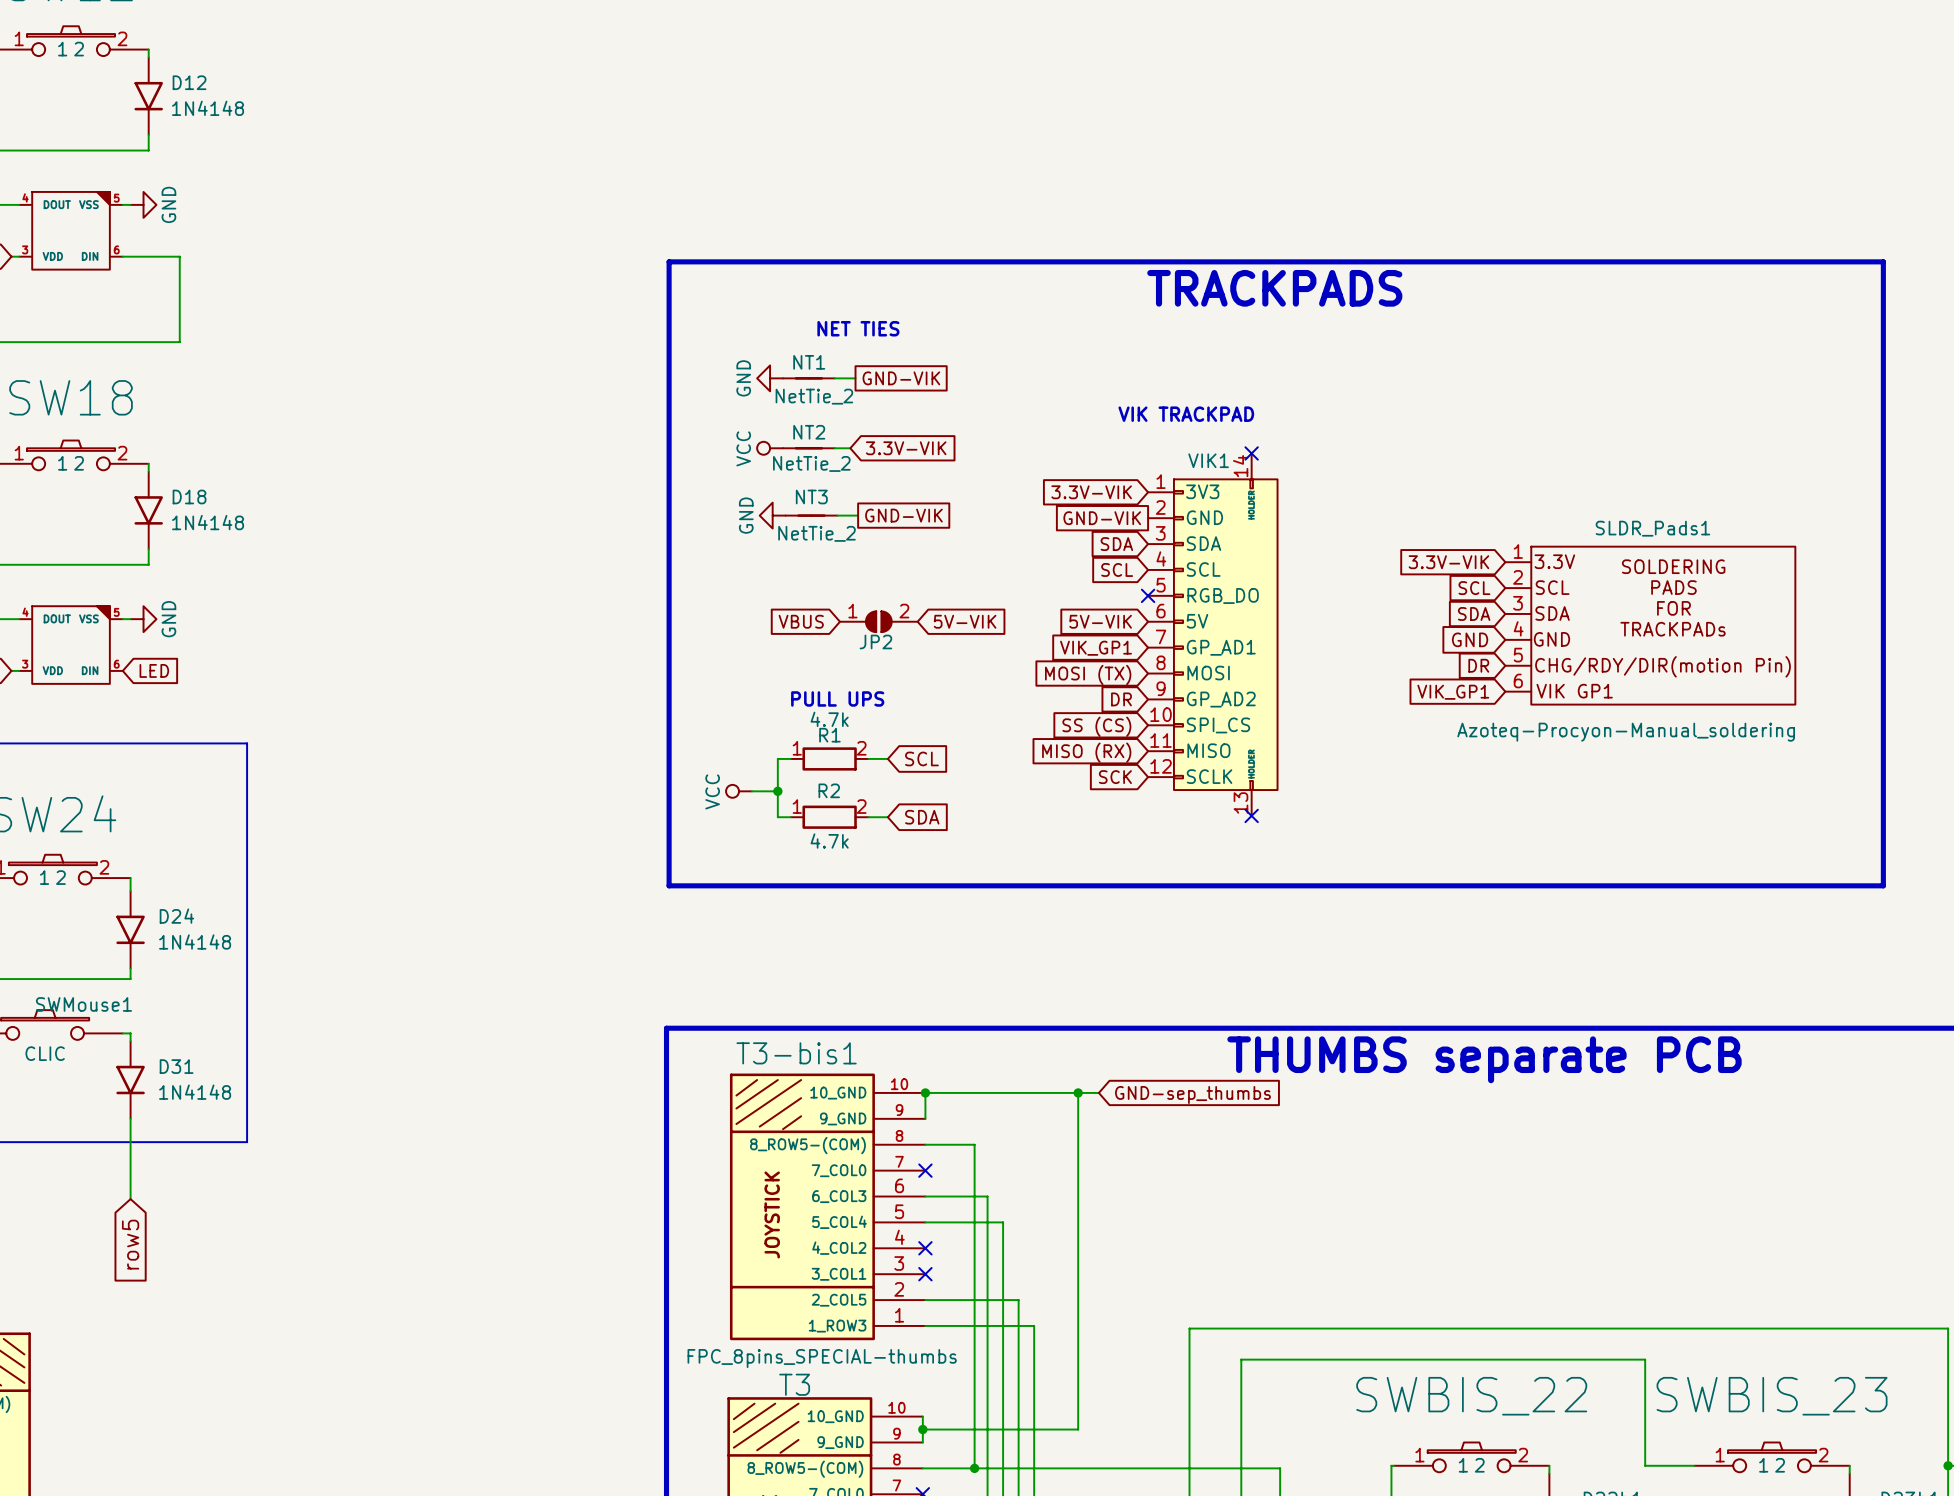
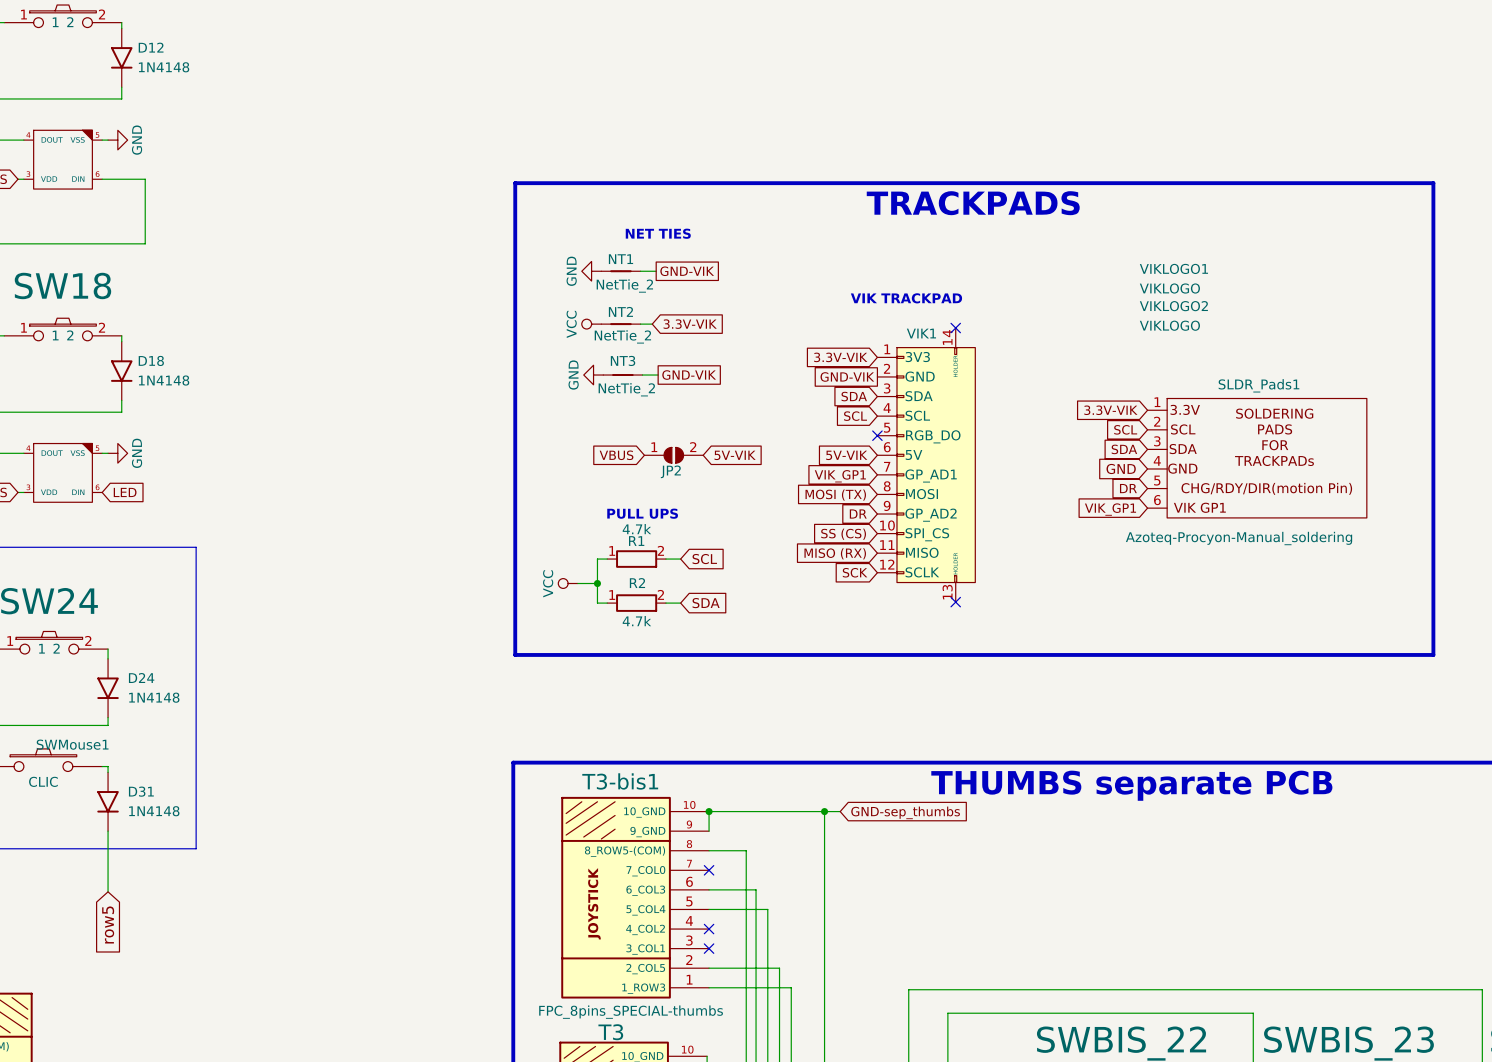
VIKLOGO1: none -> VIKLOGO (1173, 278)
VIKLOGO2: none -> VIKLOGO (1173, 315)

